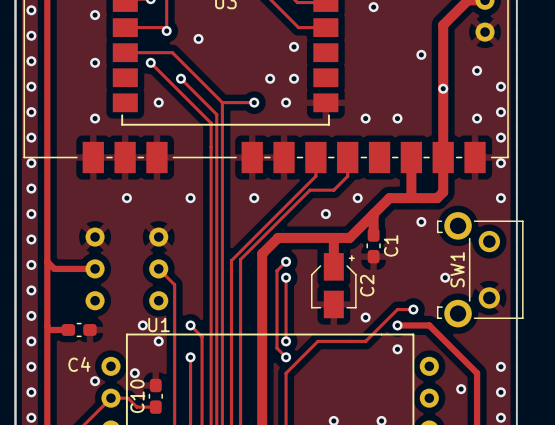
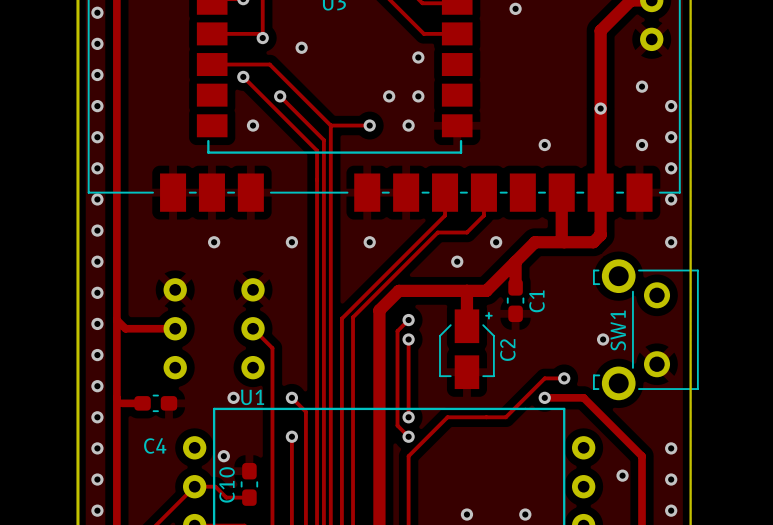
via: (95, 15) -> none
via: (421, 54) -> none
via: (95, 62) -> none
via: (95, 118) -> none
via: (365, 118) -> none
via: (421, 221) -> none
via: (365, 317) -> none
via: (158, 341) -> none
via: (397, 349) -> none
via: (95, 381) -> none

